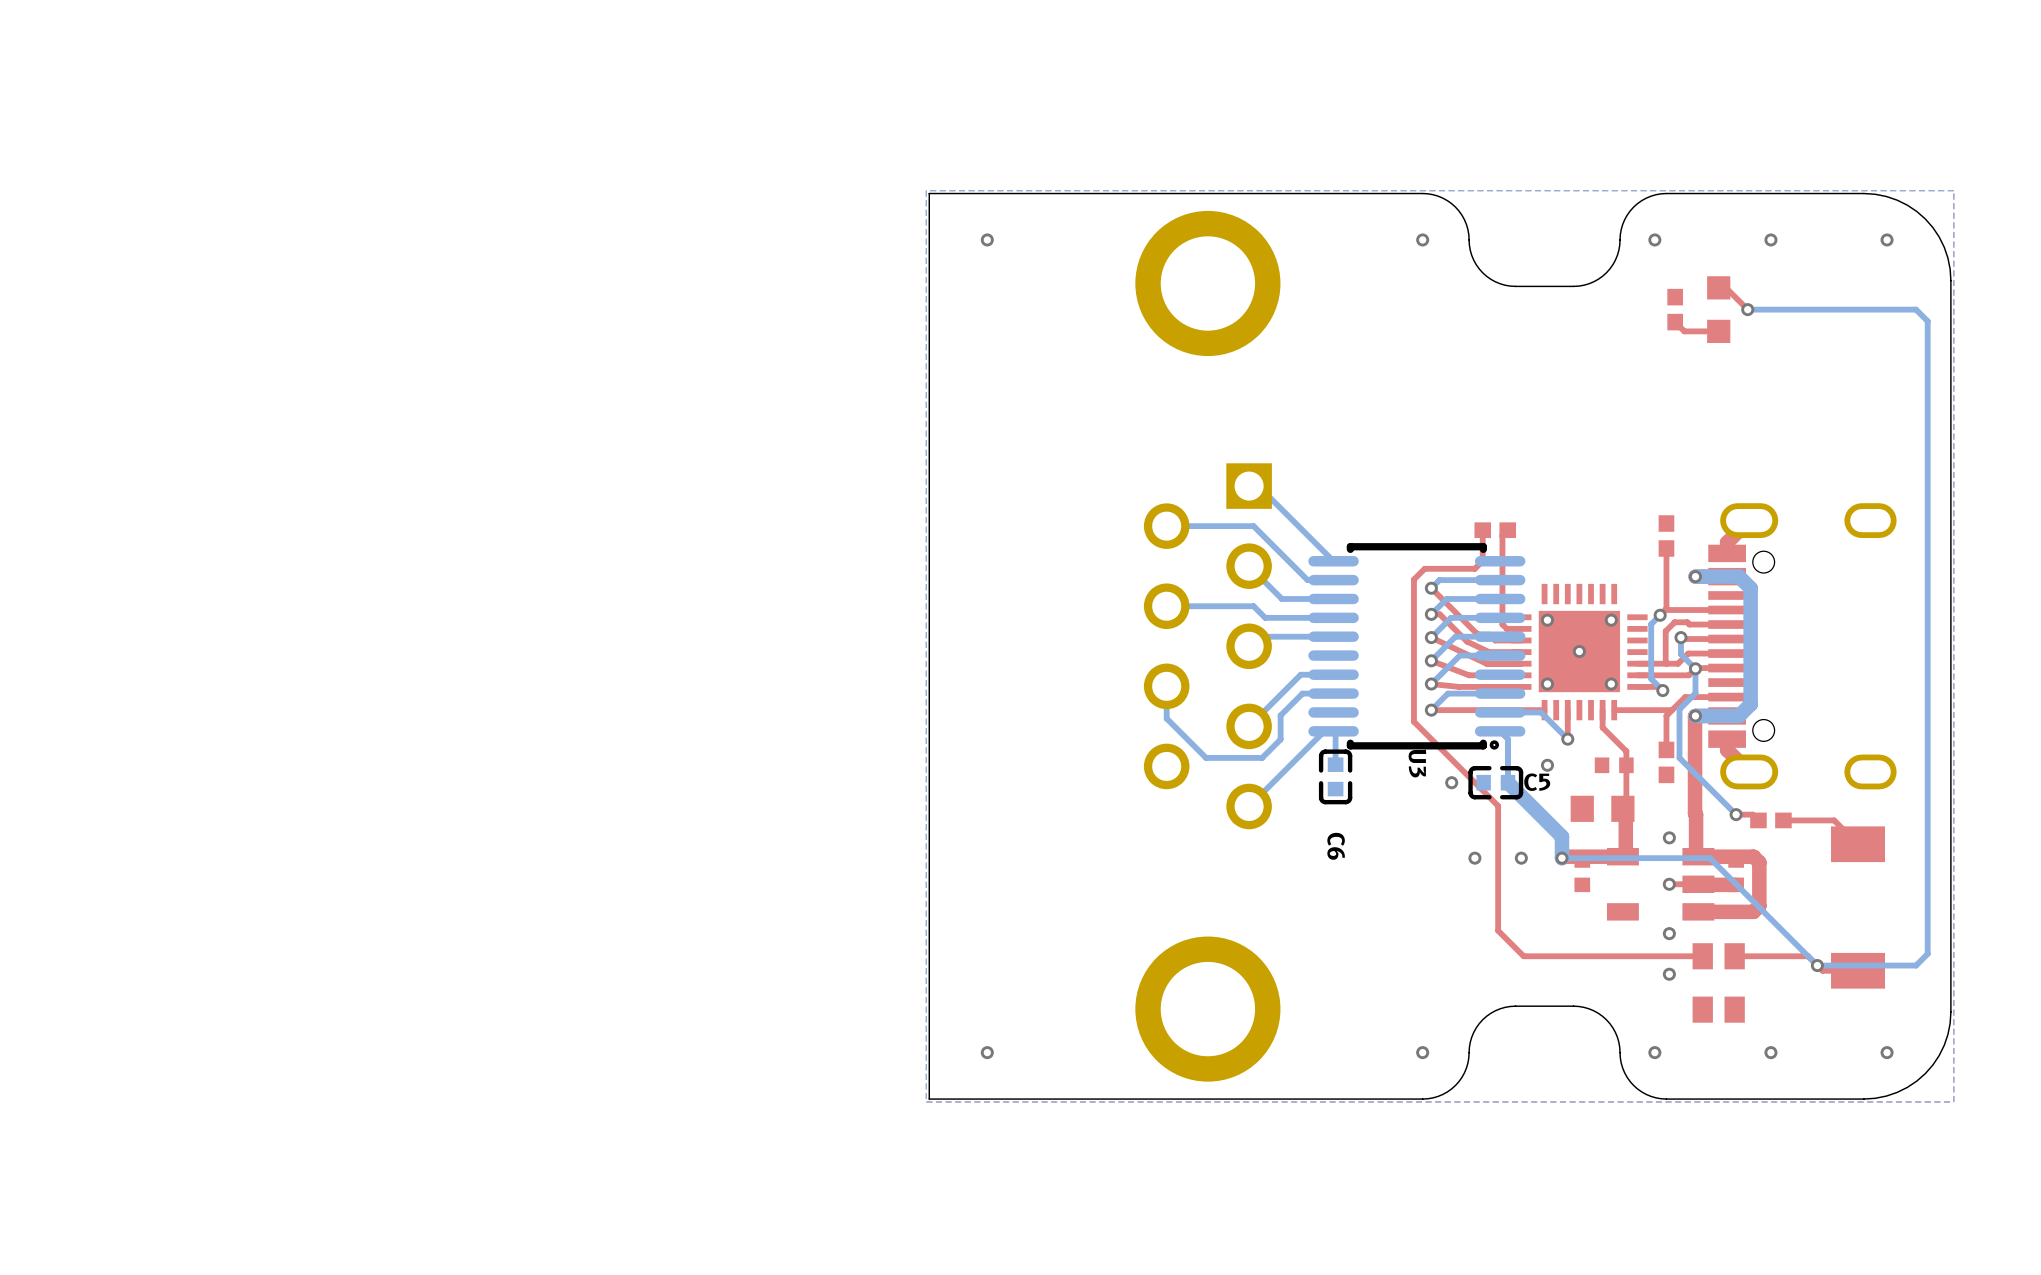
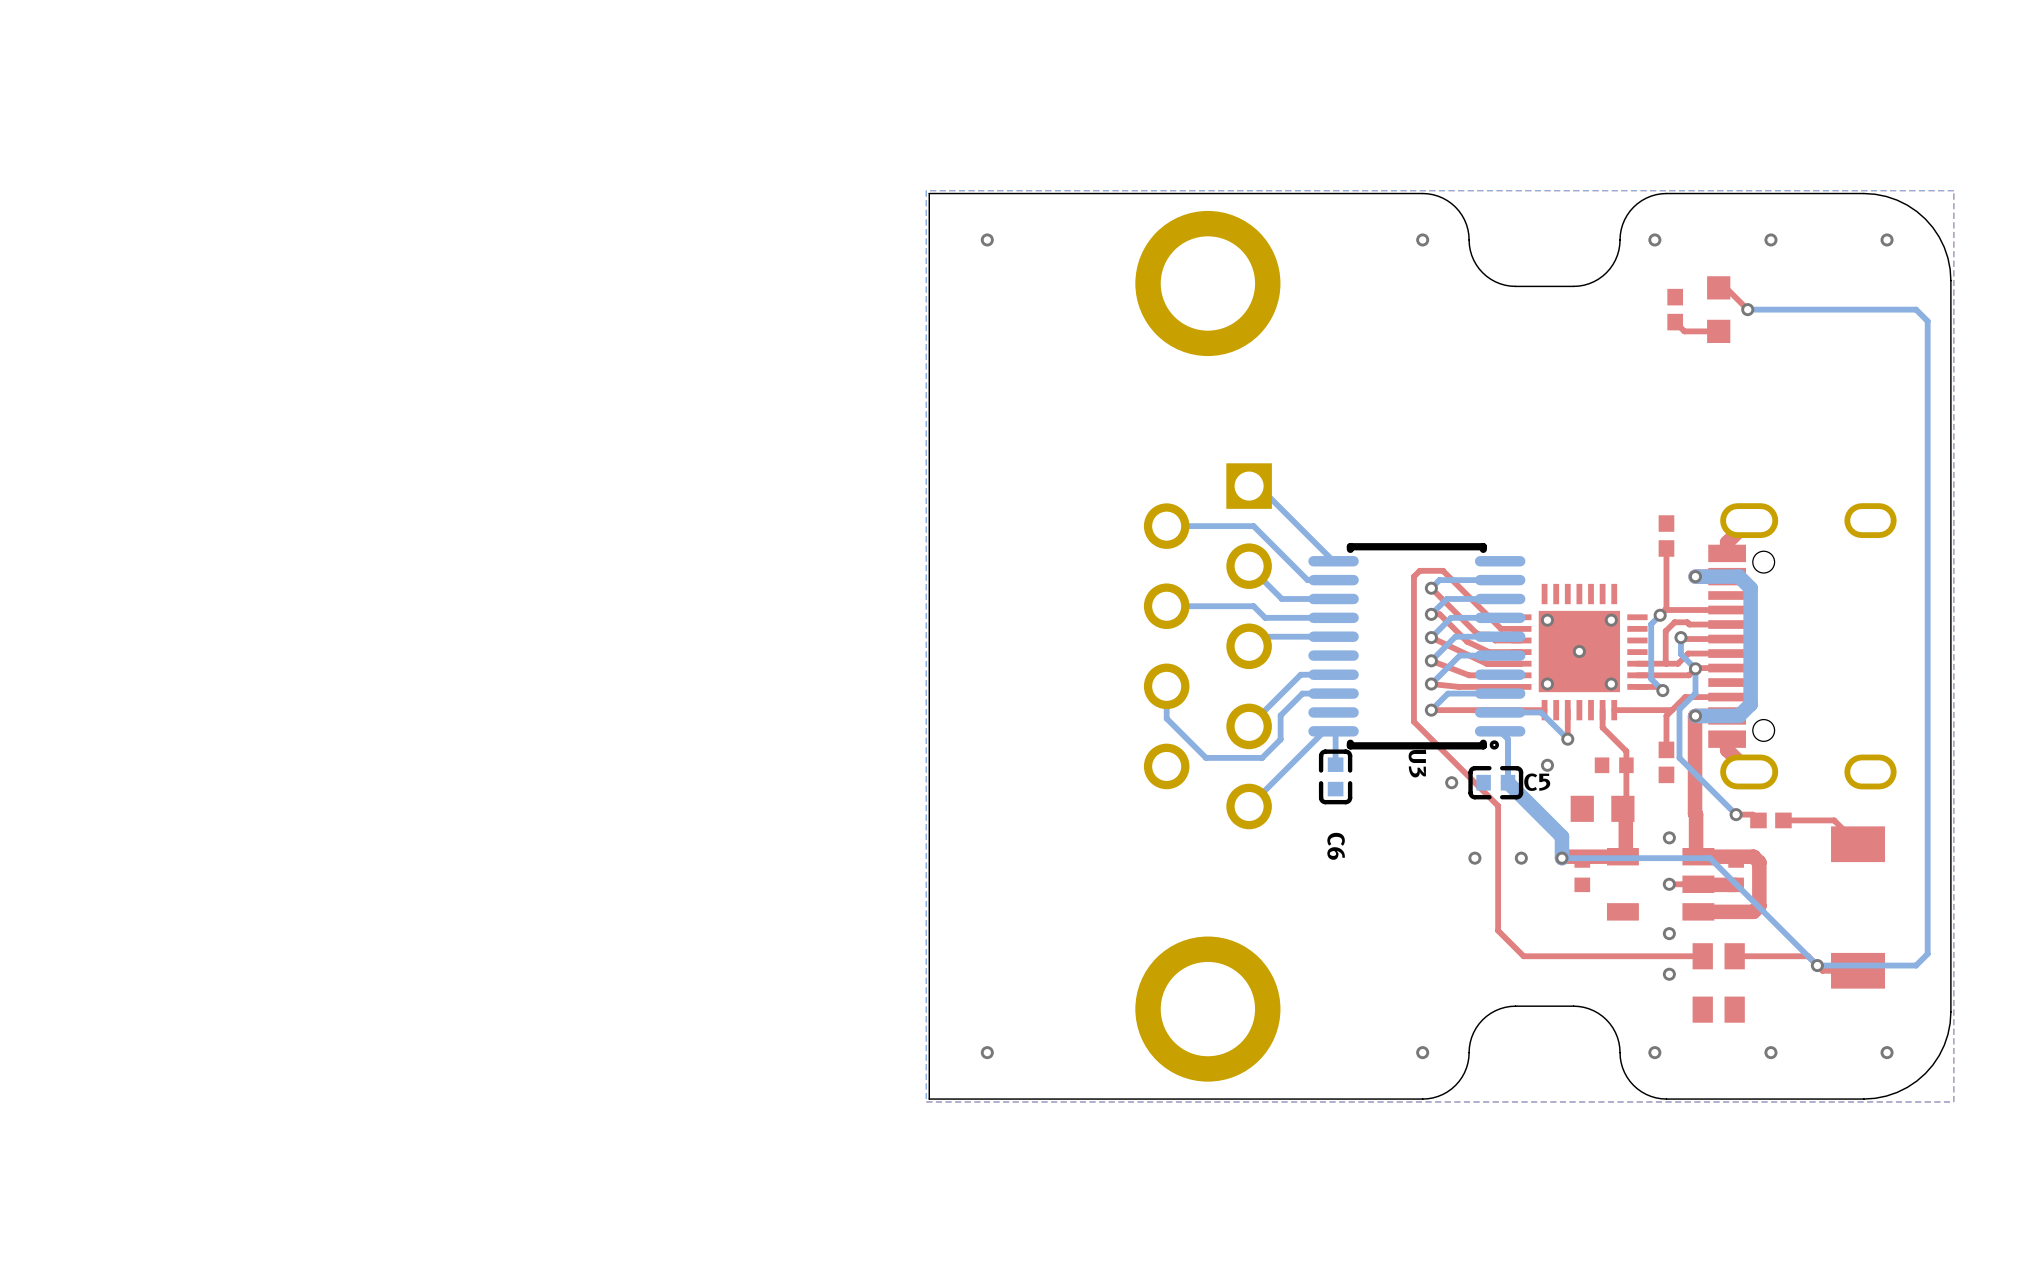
top track: (1482, 530) (1482, 560) (1474, 568) (1424, 568) (1413, 579) -> (1506, 628) (1501, 628) (1442, 570) (1419, 570) (1413, 576) (1413, 579)
part: (1495, 530) -> none
top track: (1507, 530) (1502, 535) (1502, 624) (1506, 628) -> none

